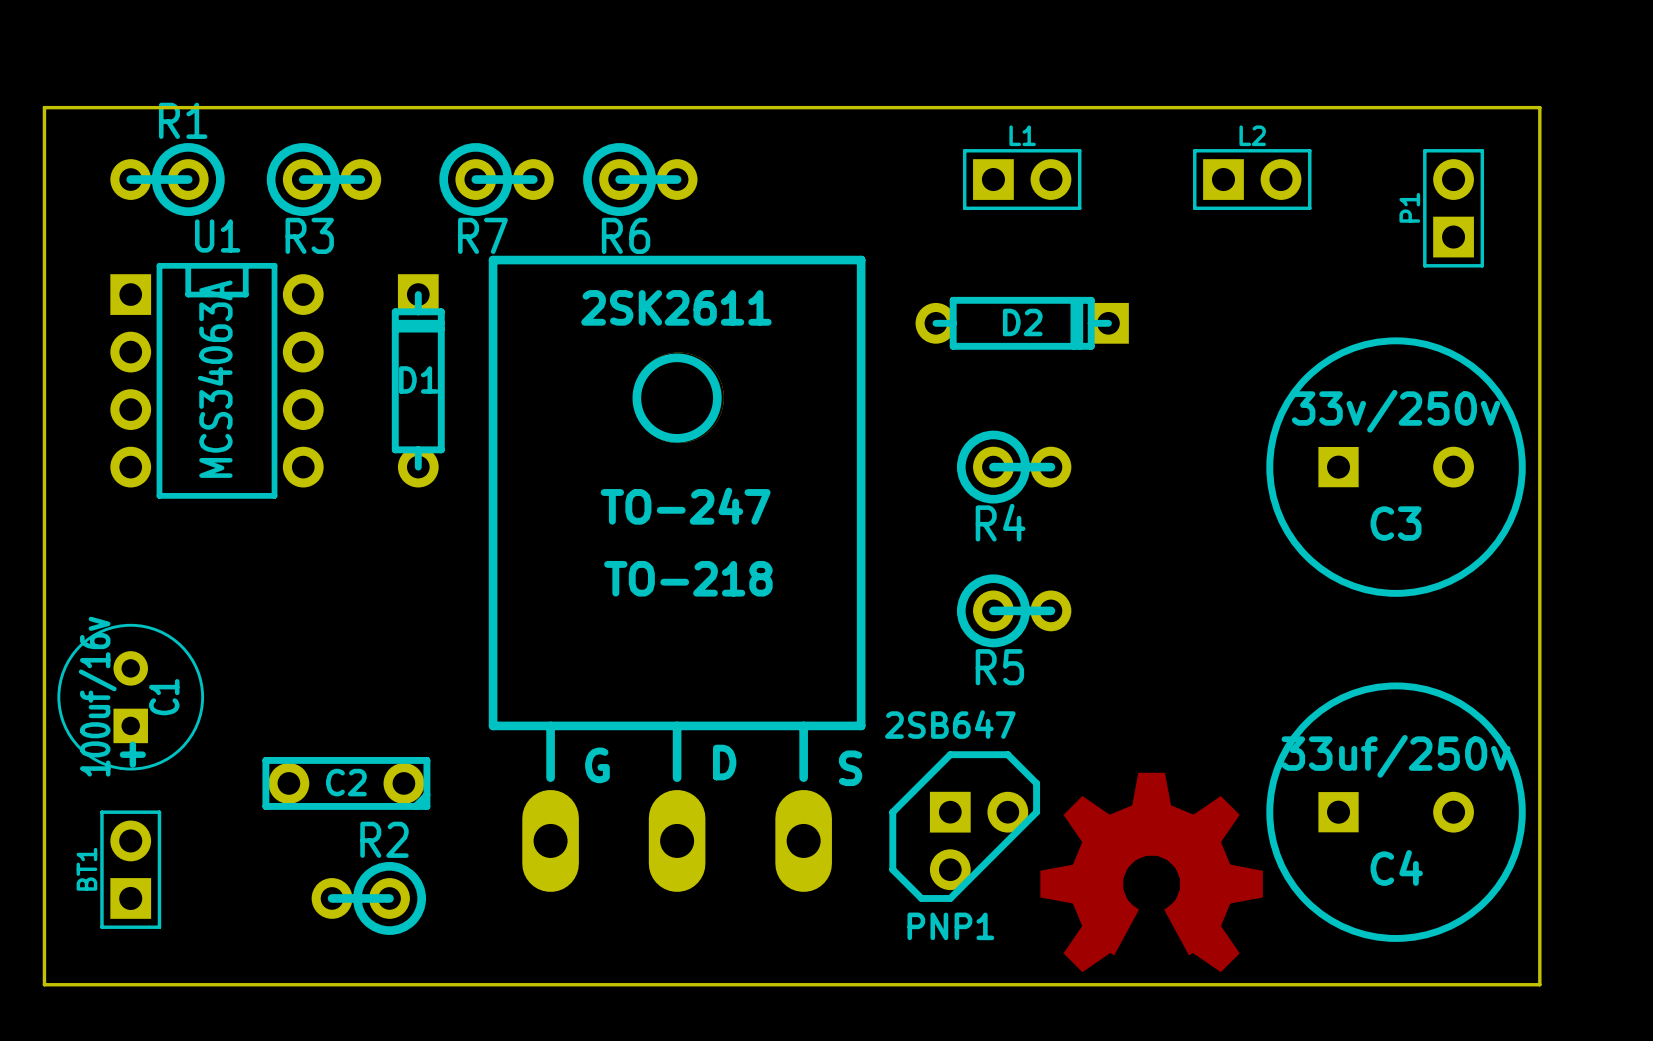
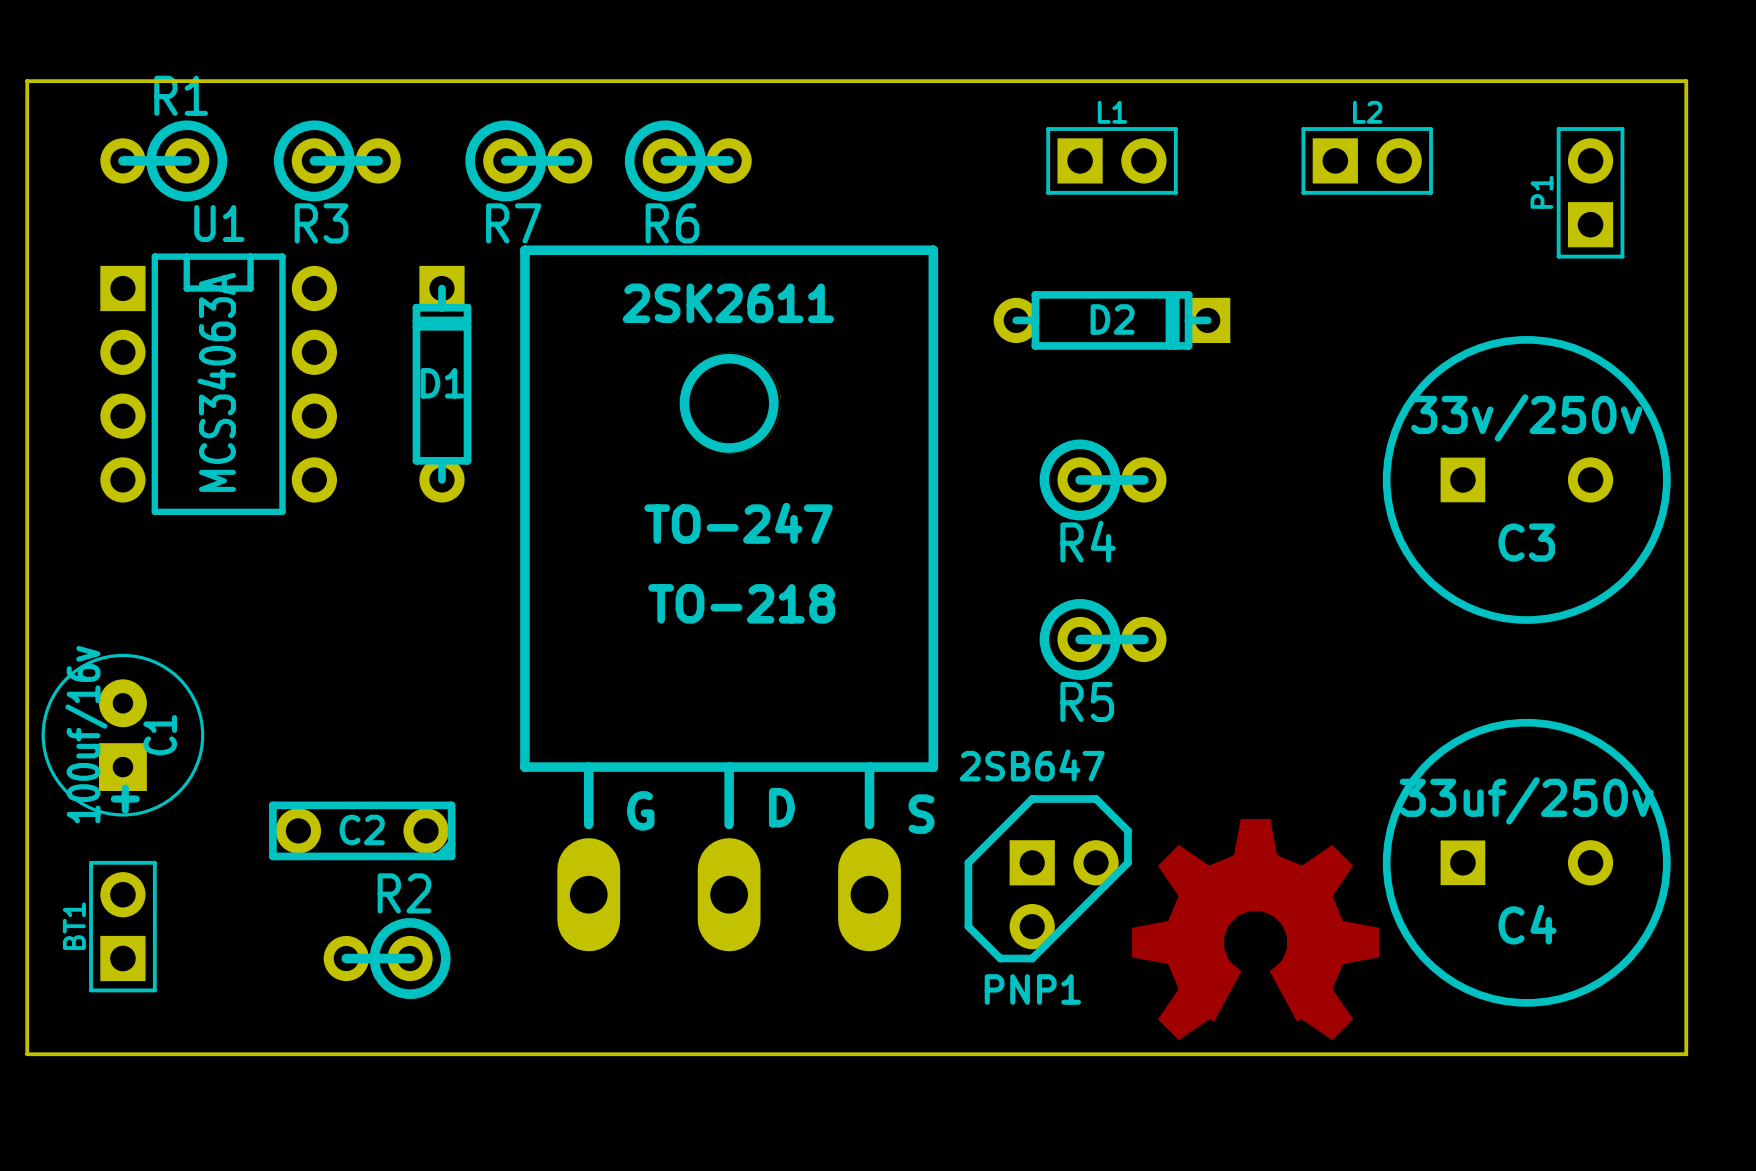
C1 footprint: [57, 623, 205, 771] -> [41, 653, 205, 817]

